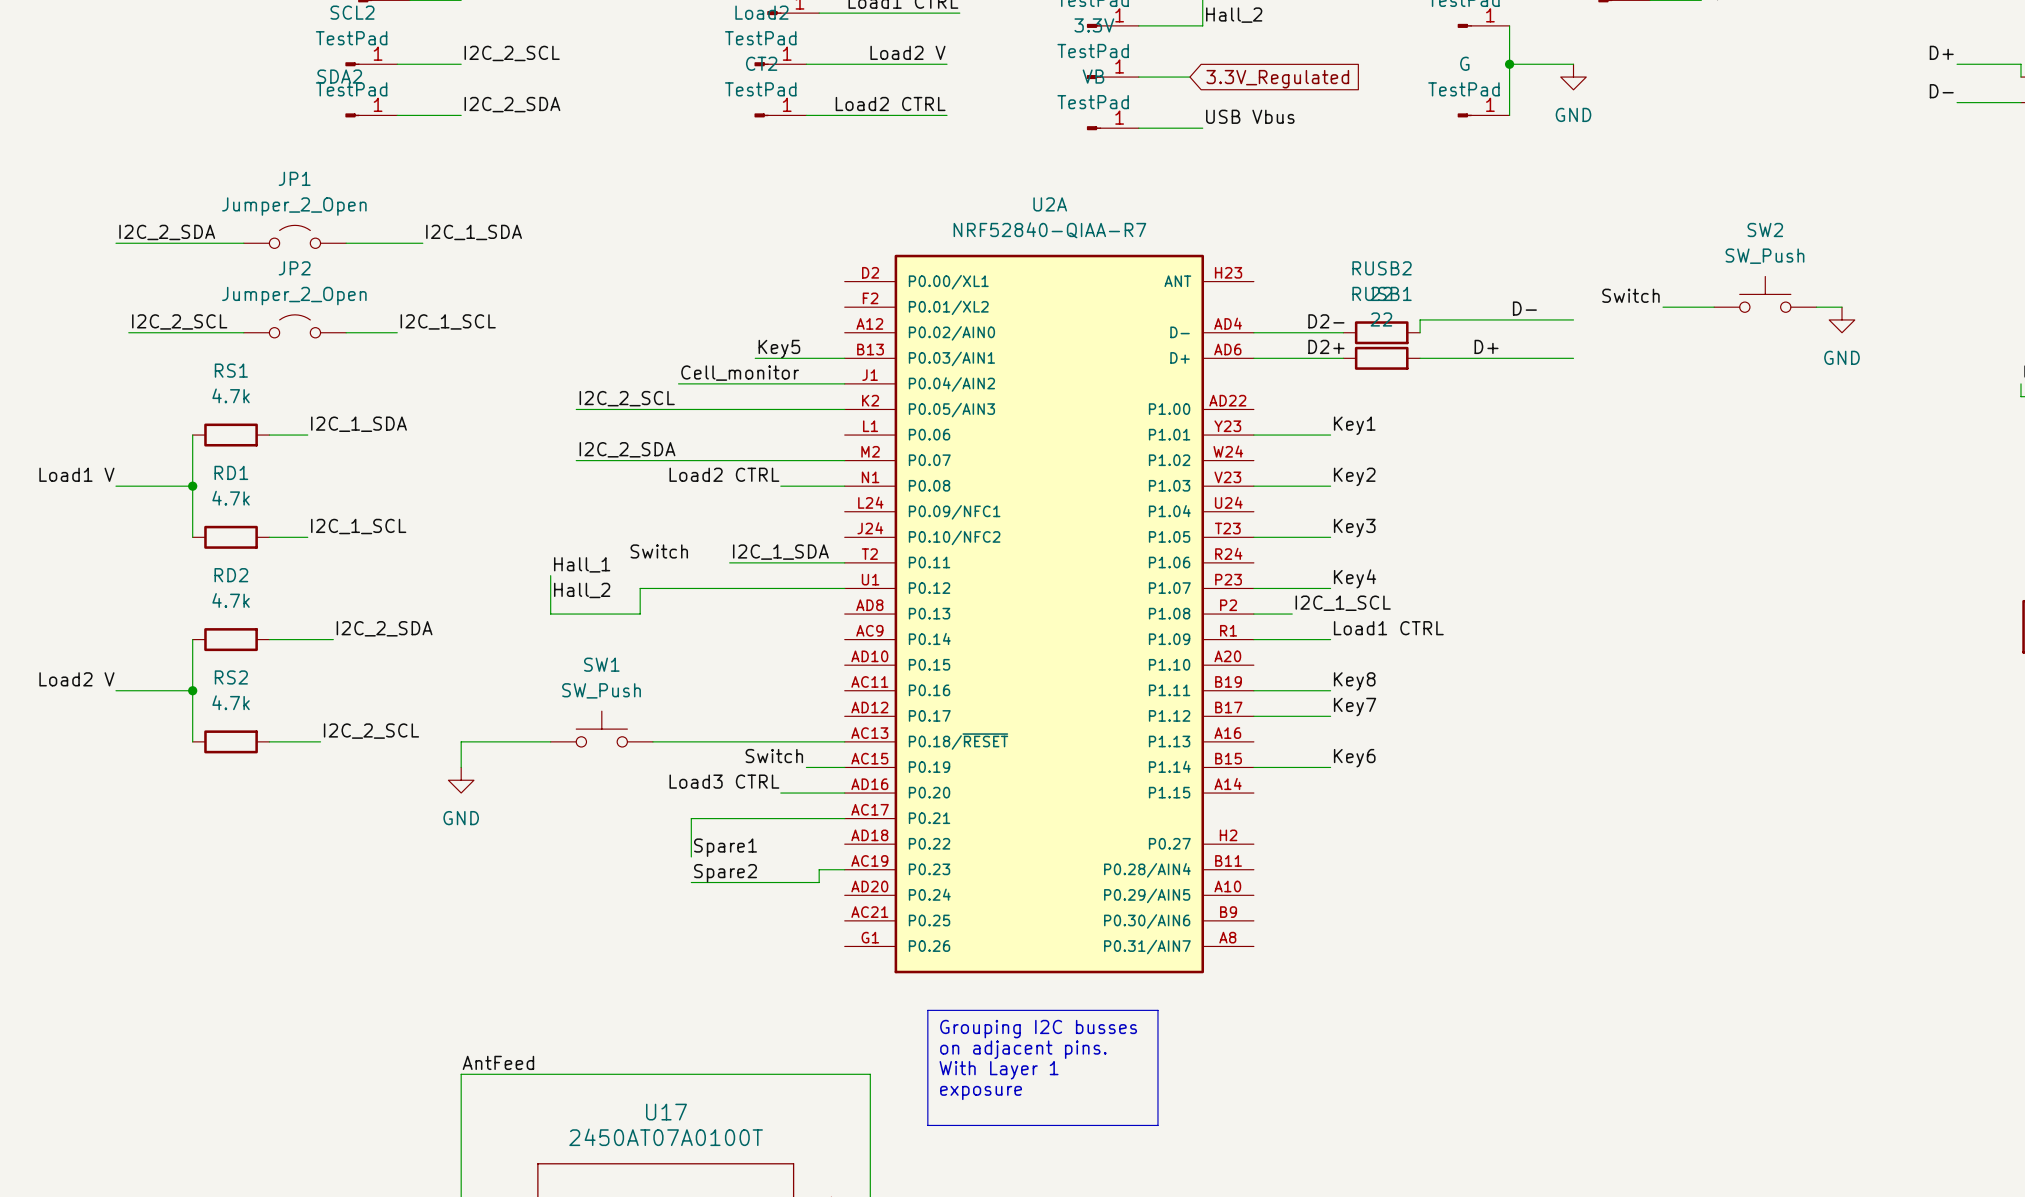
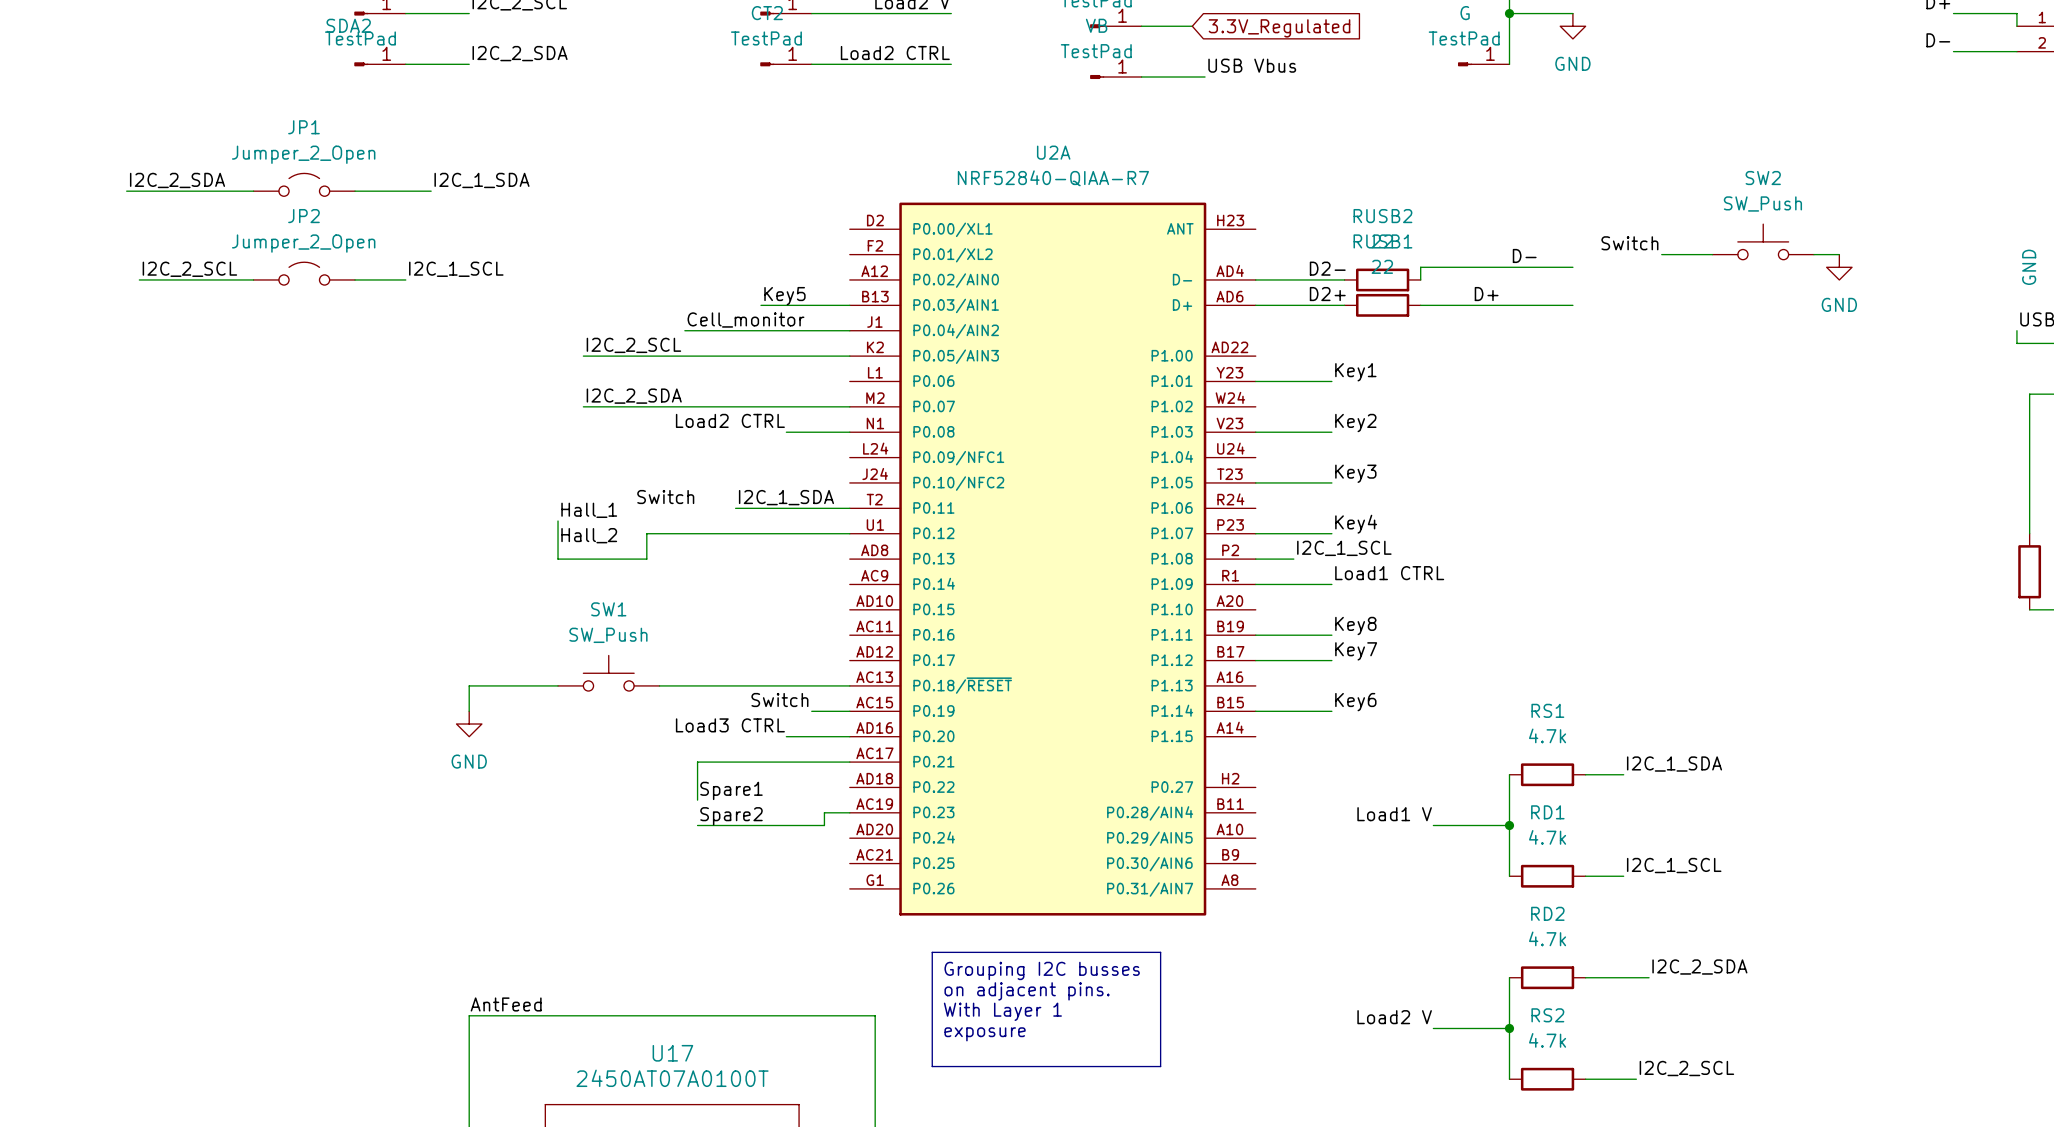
label: I2C_1_SDA (358, 424) -> none
wire: (192, 435) (192, 537) -> none
RS1 position: (231, 435) -> (1547, 774)
wire: (269, 435) (307, 435) -> none
label: Load1 V (76, 474) -> none
wire: (115, 486) (192, 486) -> none
junction: (192, 486) -> none
label: I2C_1_SCL (358, 526) -> none
RD1 position: (231, 537) -> (1547, 876)
wire: (269, 537) (307, 537) -> none
label: I2C_2_SDA (384, 628) -> none
wire: (192, 639) (192, 741) -> none
RD2 position: (231, 639) -> (1547, 977)
wire: (269, 639) (333, 639) -> none
label: Load2 V (76, 679) -> none
wire: (115, 690) (192, 690) -> none
junction: (192, 690) -> none
label: I2C_2_SCL (371, 731) -> none
RS2 position: (231, 741) -> (1547, 1079)
wire: (269, 741) (320, 741) -> none
label: none -> I2C_1_SDA (1674, 764)
wire: none -> (1509, 774) (1509, 876)
wire: none -> (1585, 774) (1623, 774)
label: none -> Load1 V (1394, 814)
wire: none -> (1433, 825) (1509, 825)
junction: none -> (1509, 825)
label: none -> I2C_1_SCL (1674, 865)
wire: none -> (1585, 876) (1623, 876)
label: none -> I2C_2_SDA (1699, 967)
wire: none -> (1509, 977) (1509, 1079)
wire: none -> (1585, 977) (1649, 977)
label: none -> Load2 V (1394, 1017)
wire: none -> (1433, 1028) (1509, 1028)
junction: none -> (1509, 1028)
label: none -> I2C_2_SCL (1686, 1068)
wire: none -> (1585, 1079) (1636, 1079)

